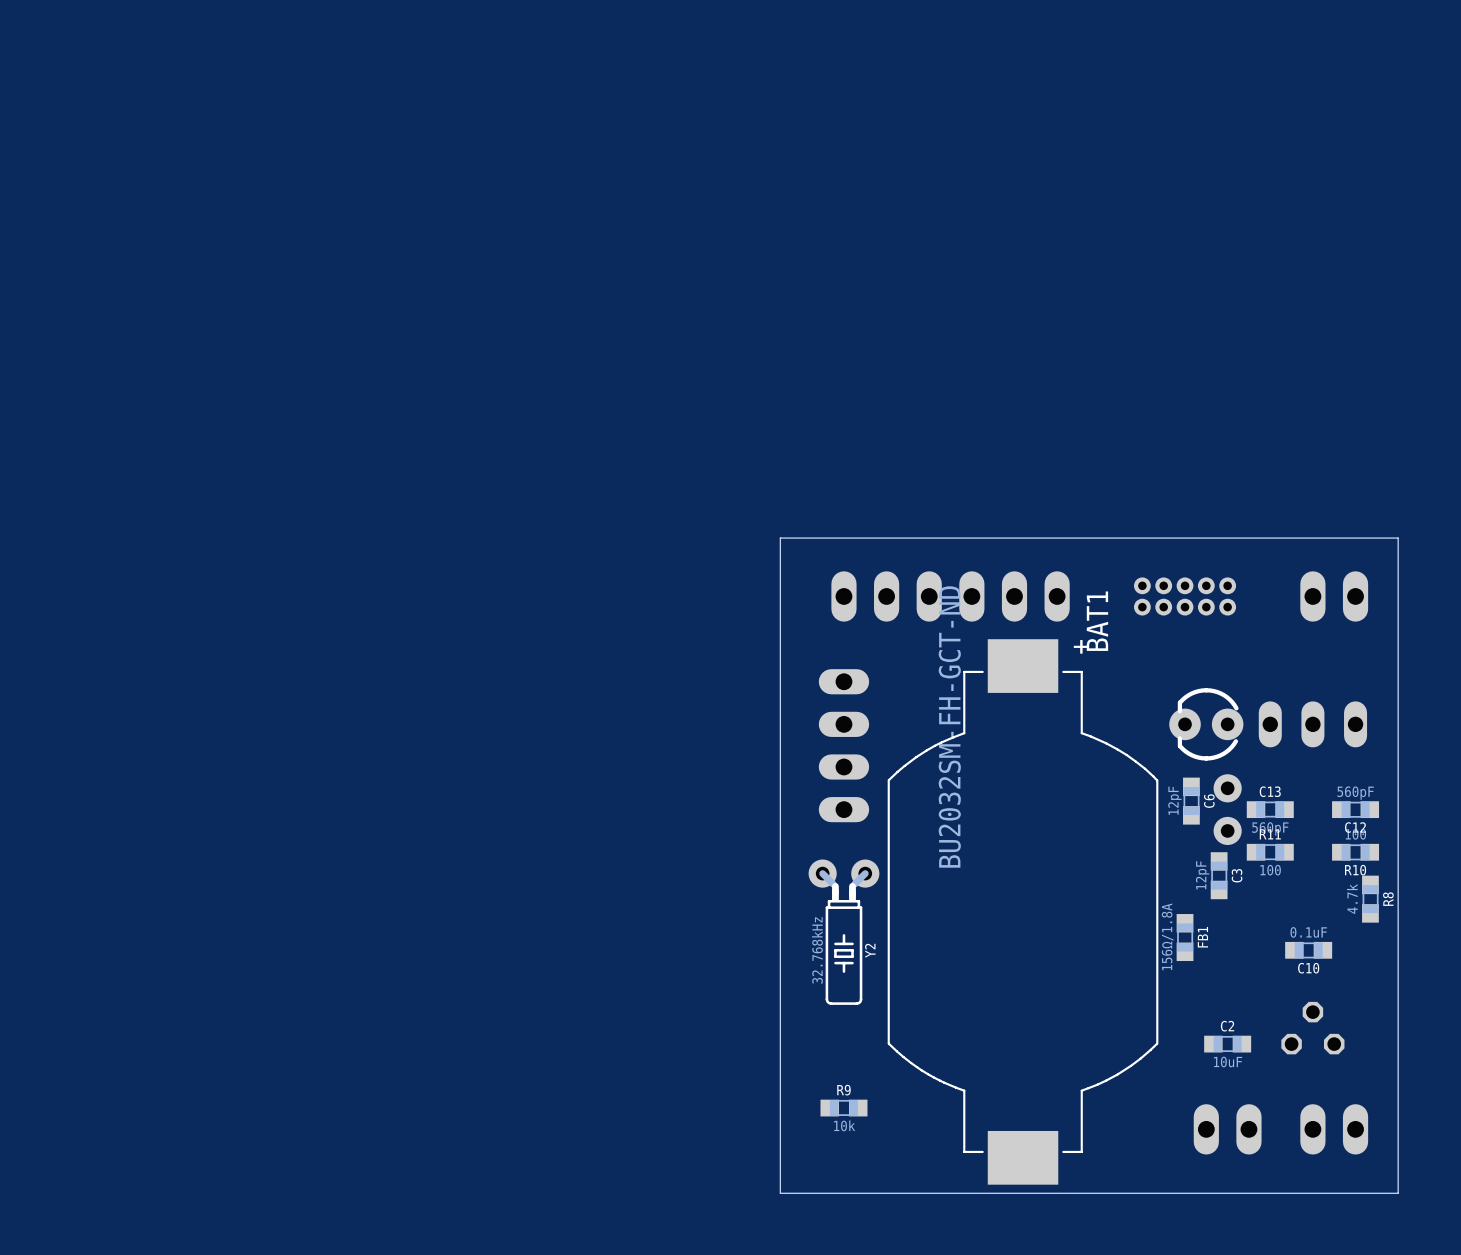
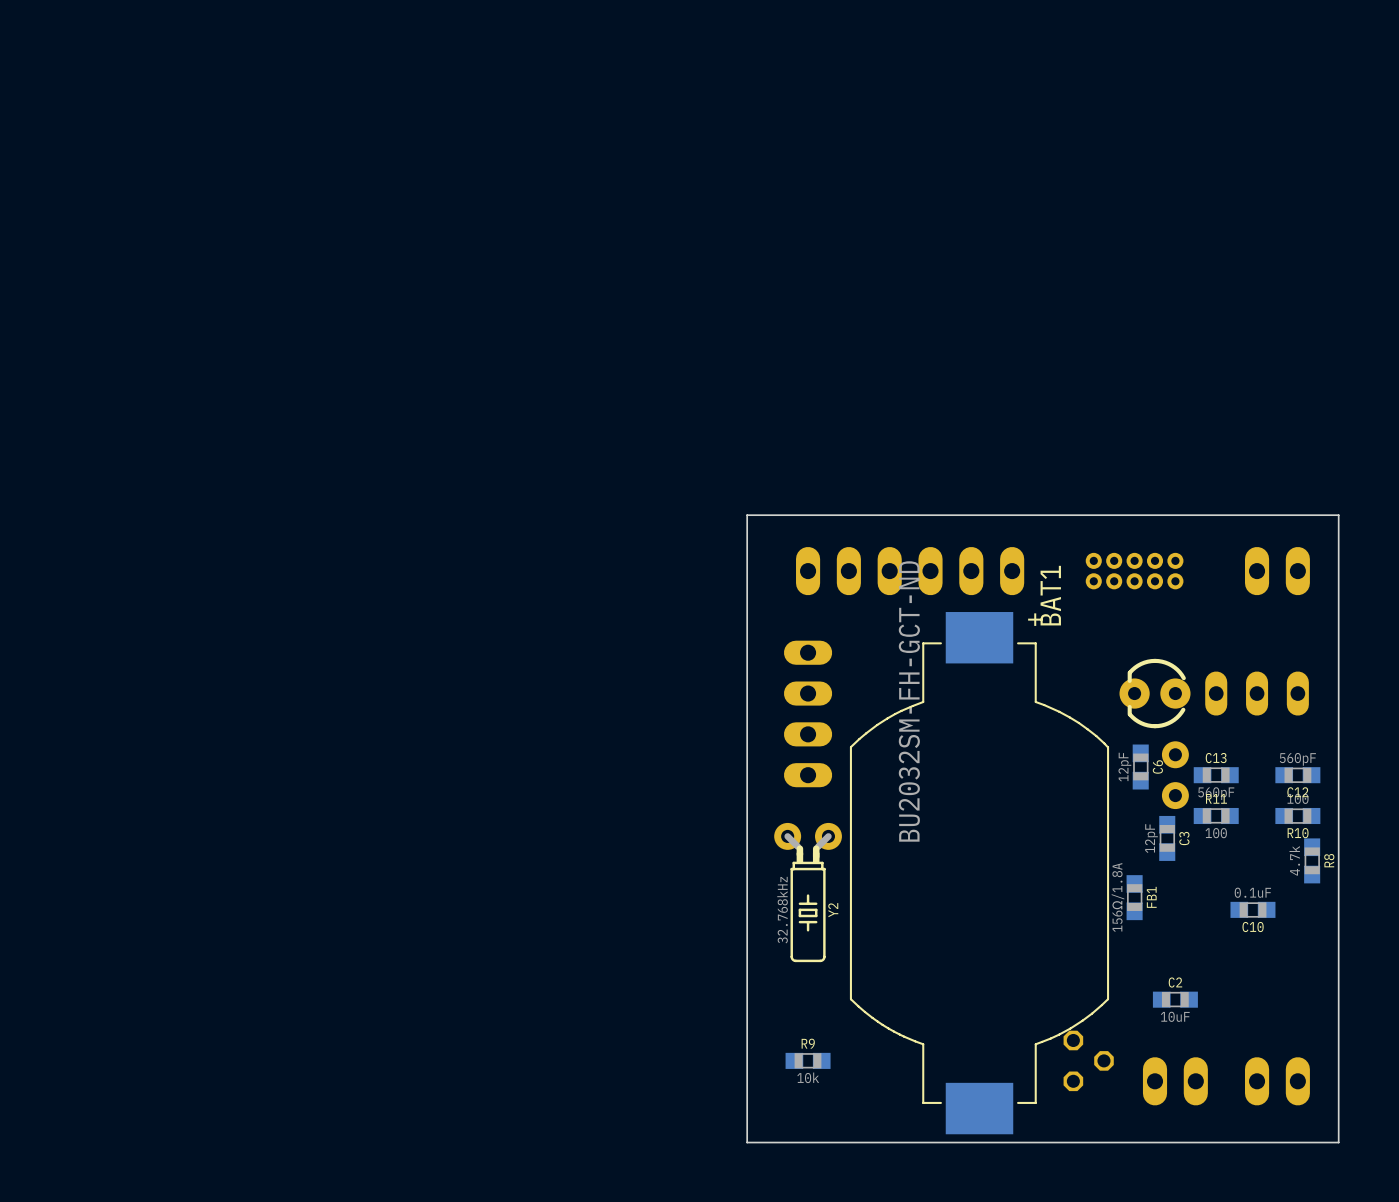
part rotation: 0° (1312, 1028) -> 90° clockwise (1088, 1060)
part position: (1312, 1028) -> (1088, 1060)

